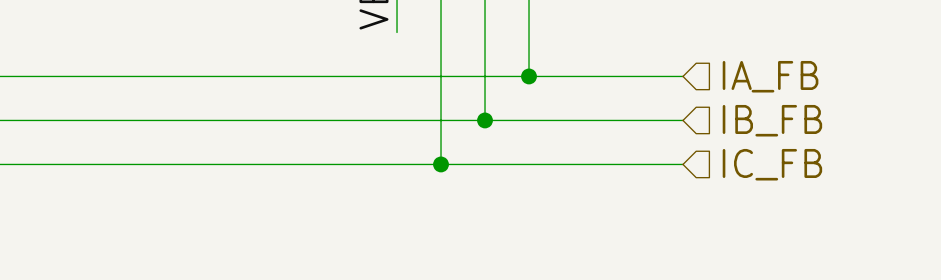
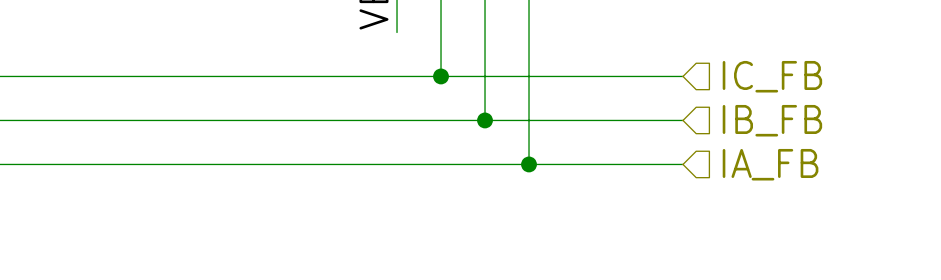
wire: (441, 76) (441, 164) -> (529, 76) (529, 164)
junction: none -> (441, 76)
junction: (529, 76) -> none
hierarchical label: IA_FB (770, 76) -> IC_FB (772, 76)
junction: (441, 164) -> none
junction: none -> (529, 164)
hierarchical label: IC_FB (772, 164) -> IA_FB (770, 164)

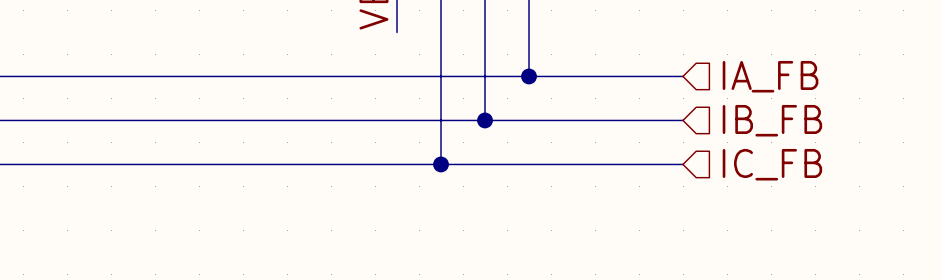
junction: (441, 76) -> none
wire: (529, 76) (529, 164) -> (441, 76) (441, 164)
junction: none -> (529, 76)
hierarchical label: IC_FB (772, 76) -> IA_FB (770, 76)
junction: none -> (441, 164)
junction: (529, 164) -> none
hierarchical label: IA_FB (770, 164) -> IC_FB (772, 164)

